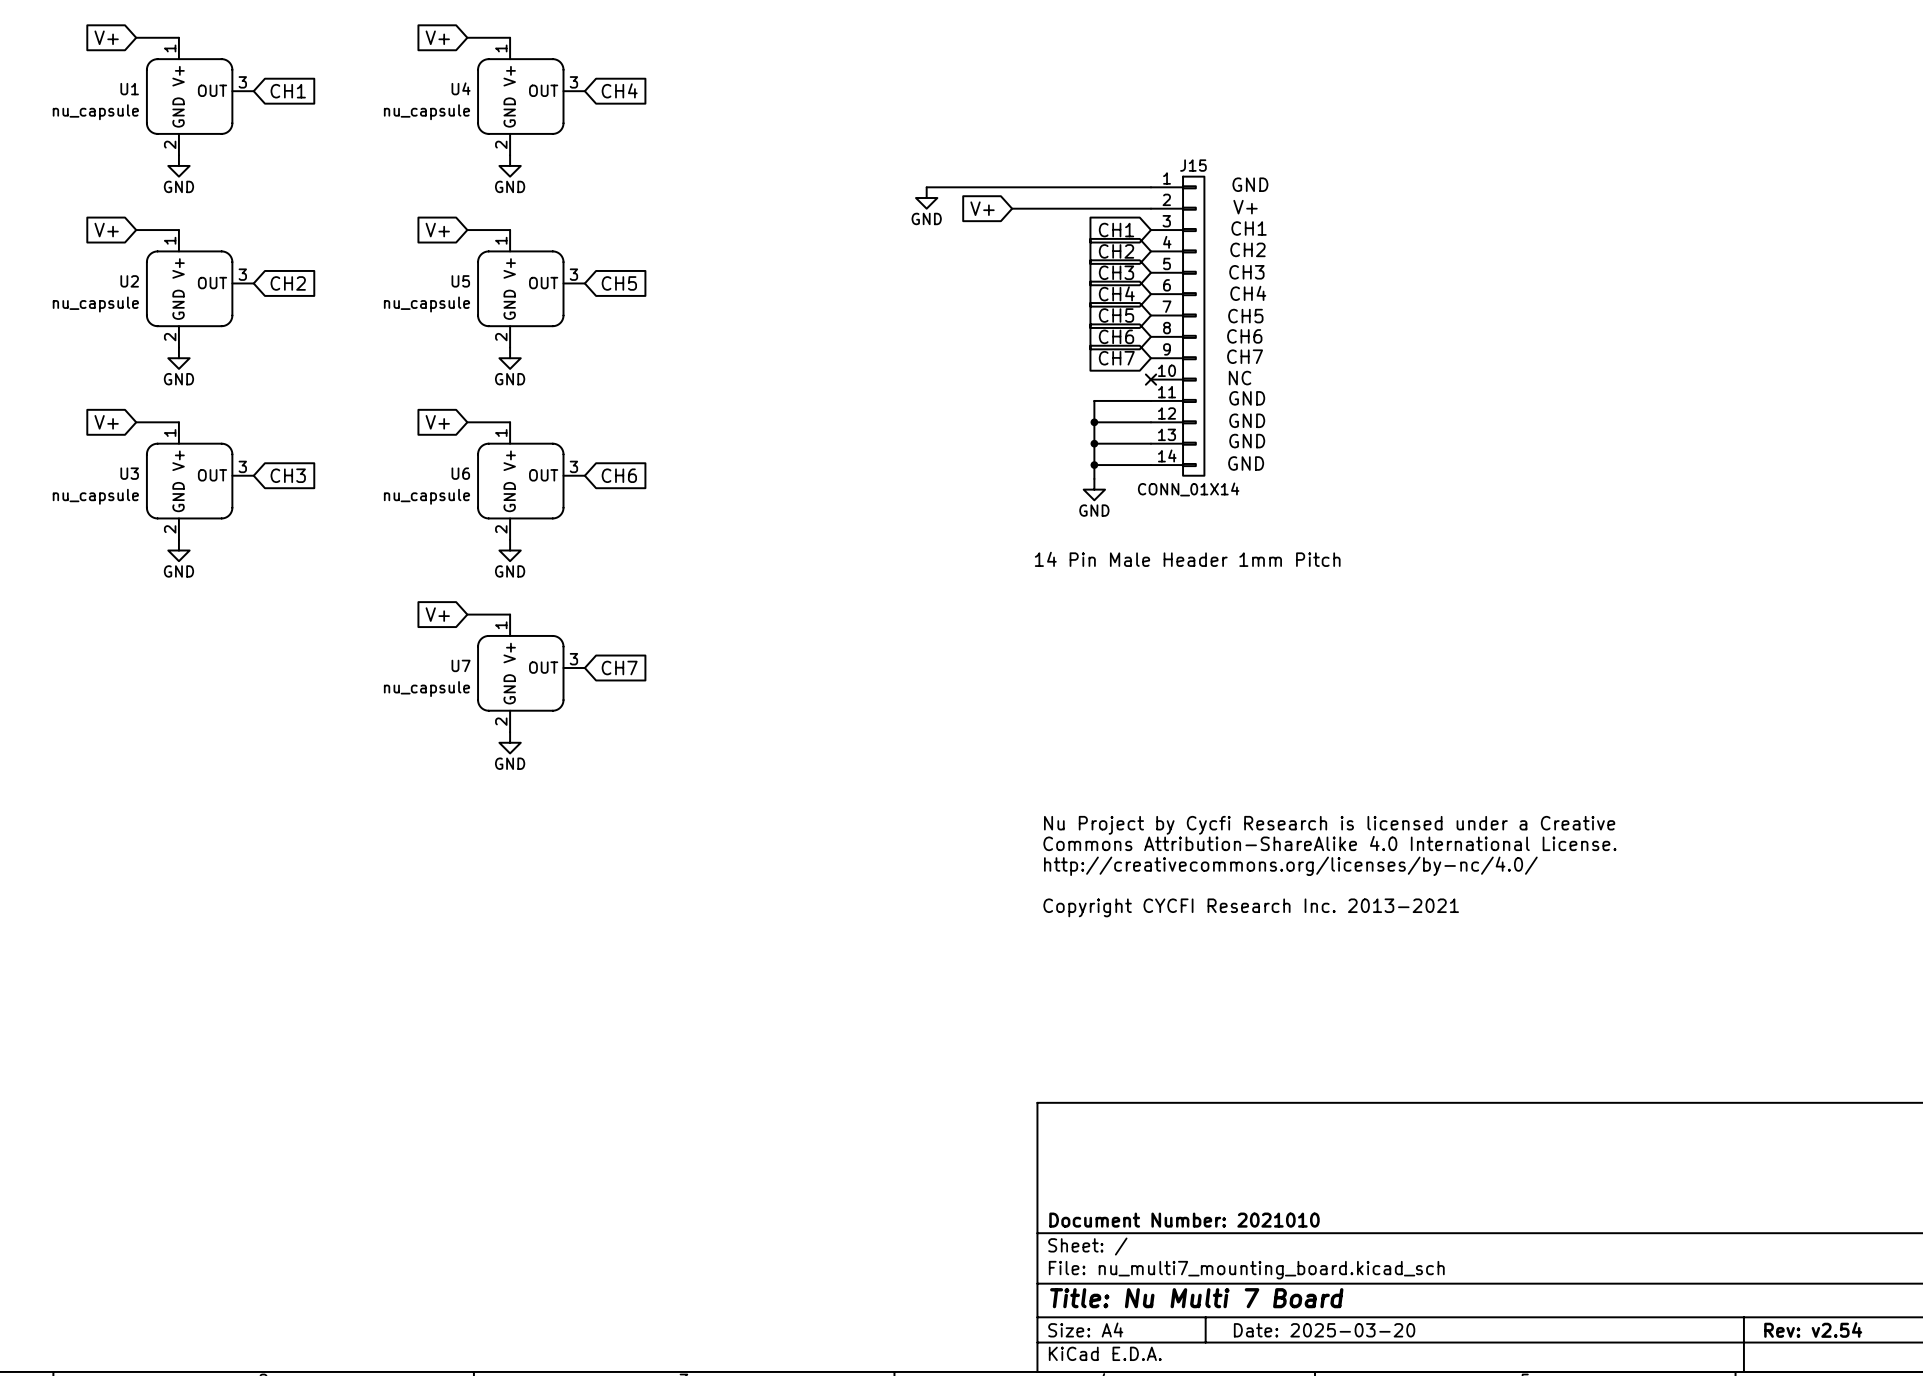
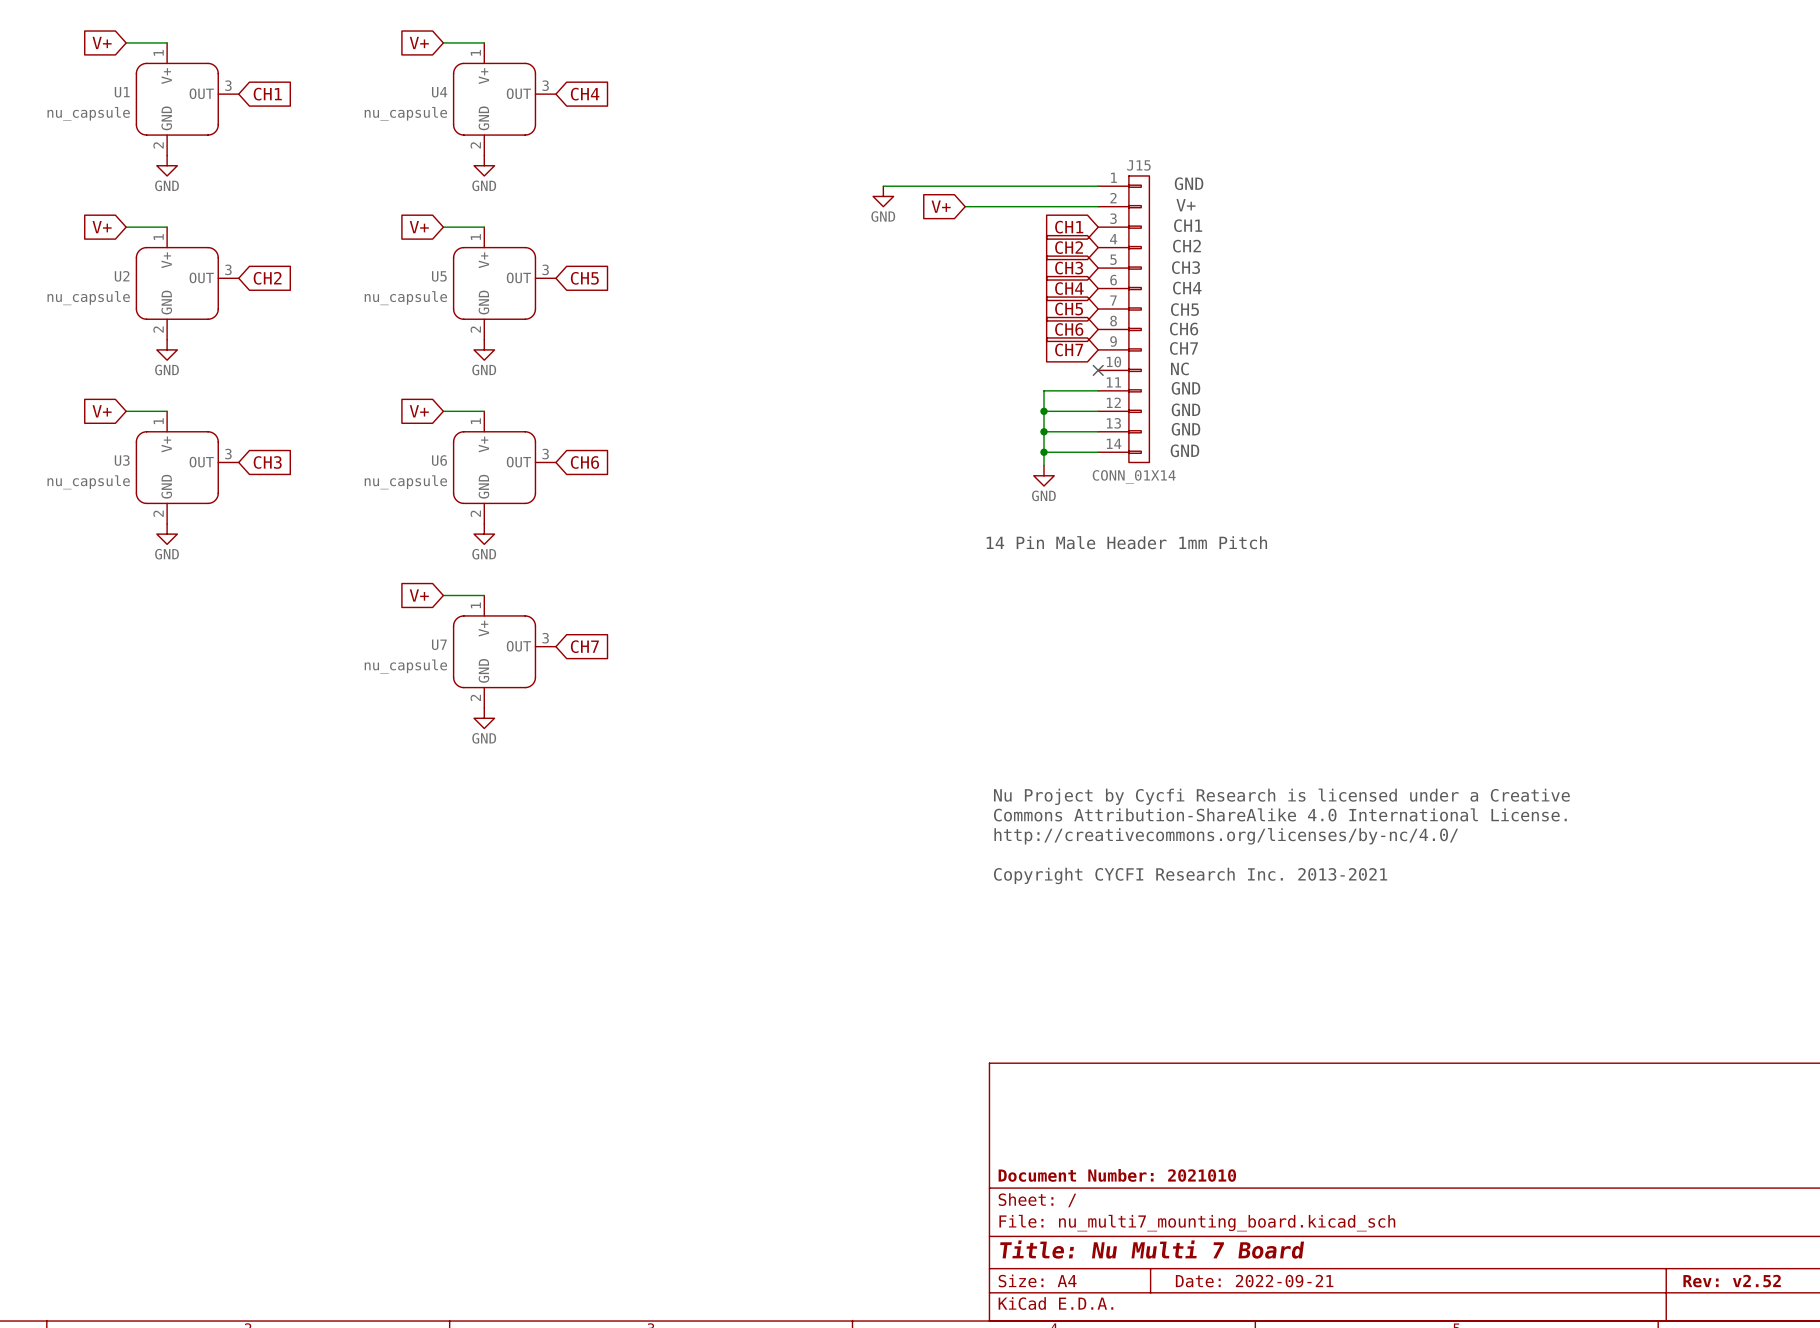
title block: Rev: v2.54 (1813, 1329) -> Rev: v2.52 (1732, 1281)
title block: Date: 2025-03-20 (1324, 1330) -> Date: 2022-09-21 (1254, 1281)

